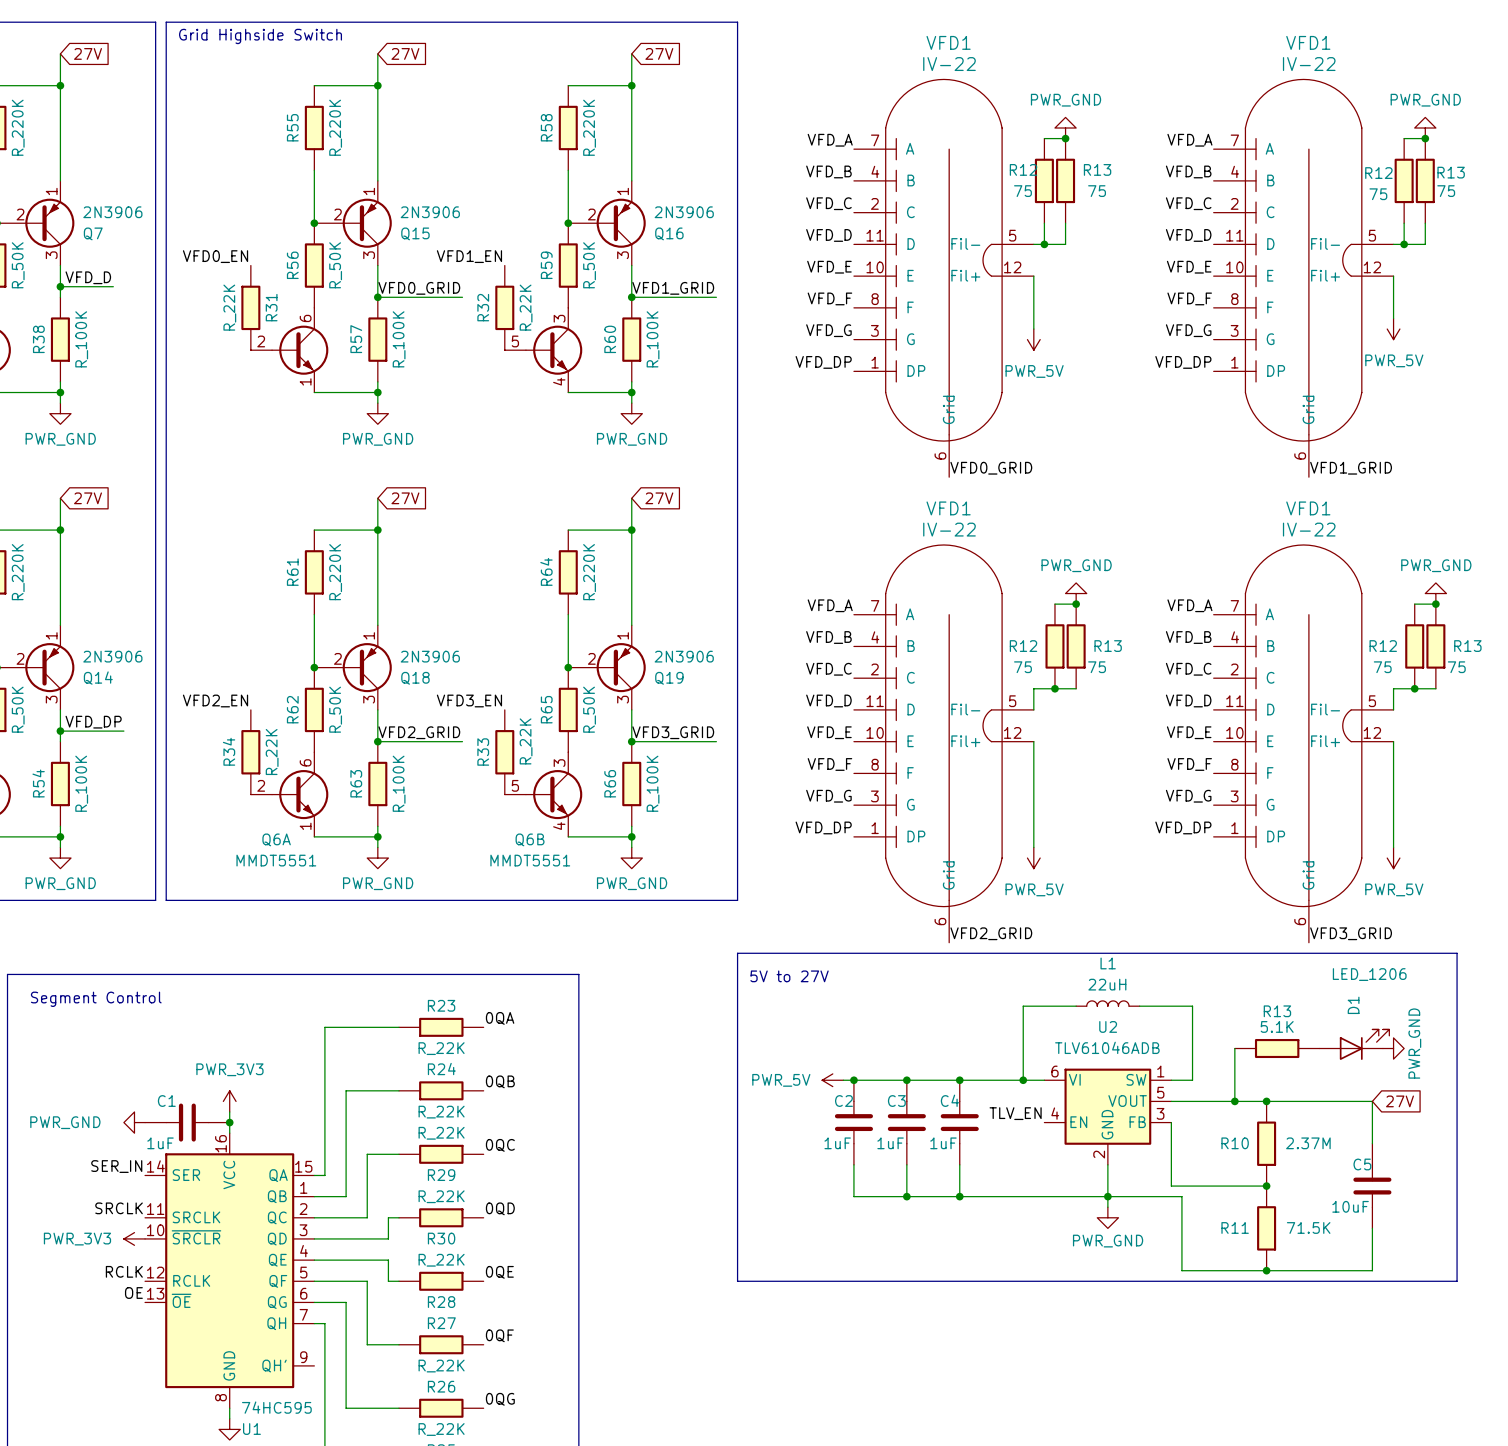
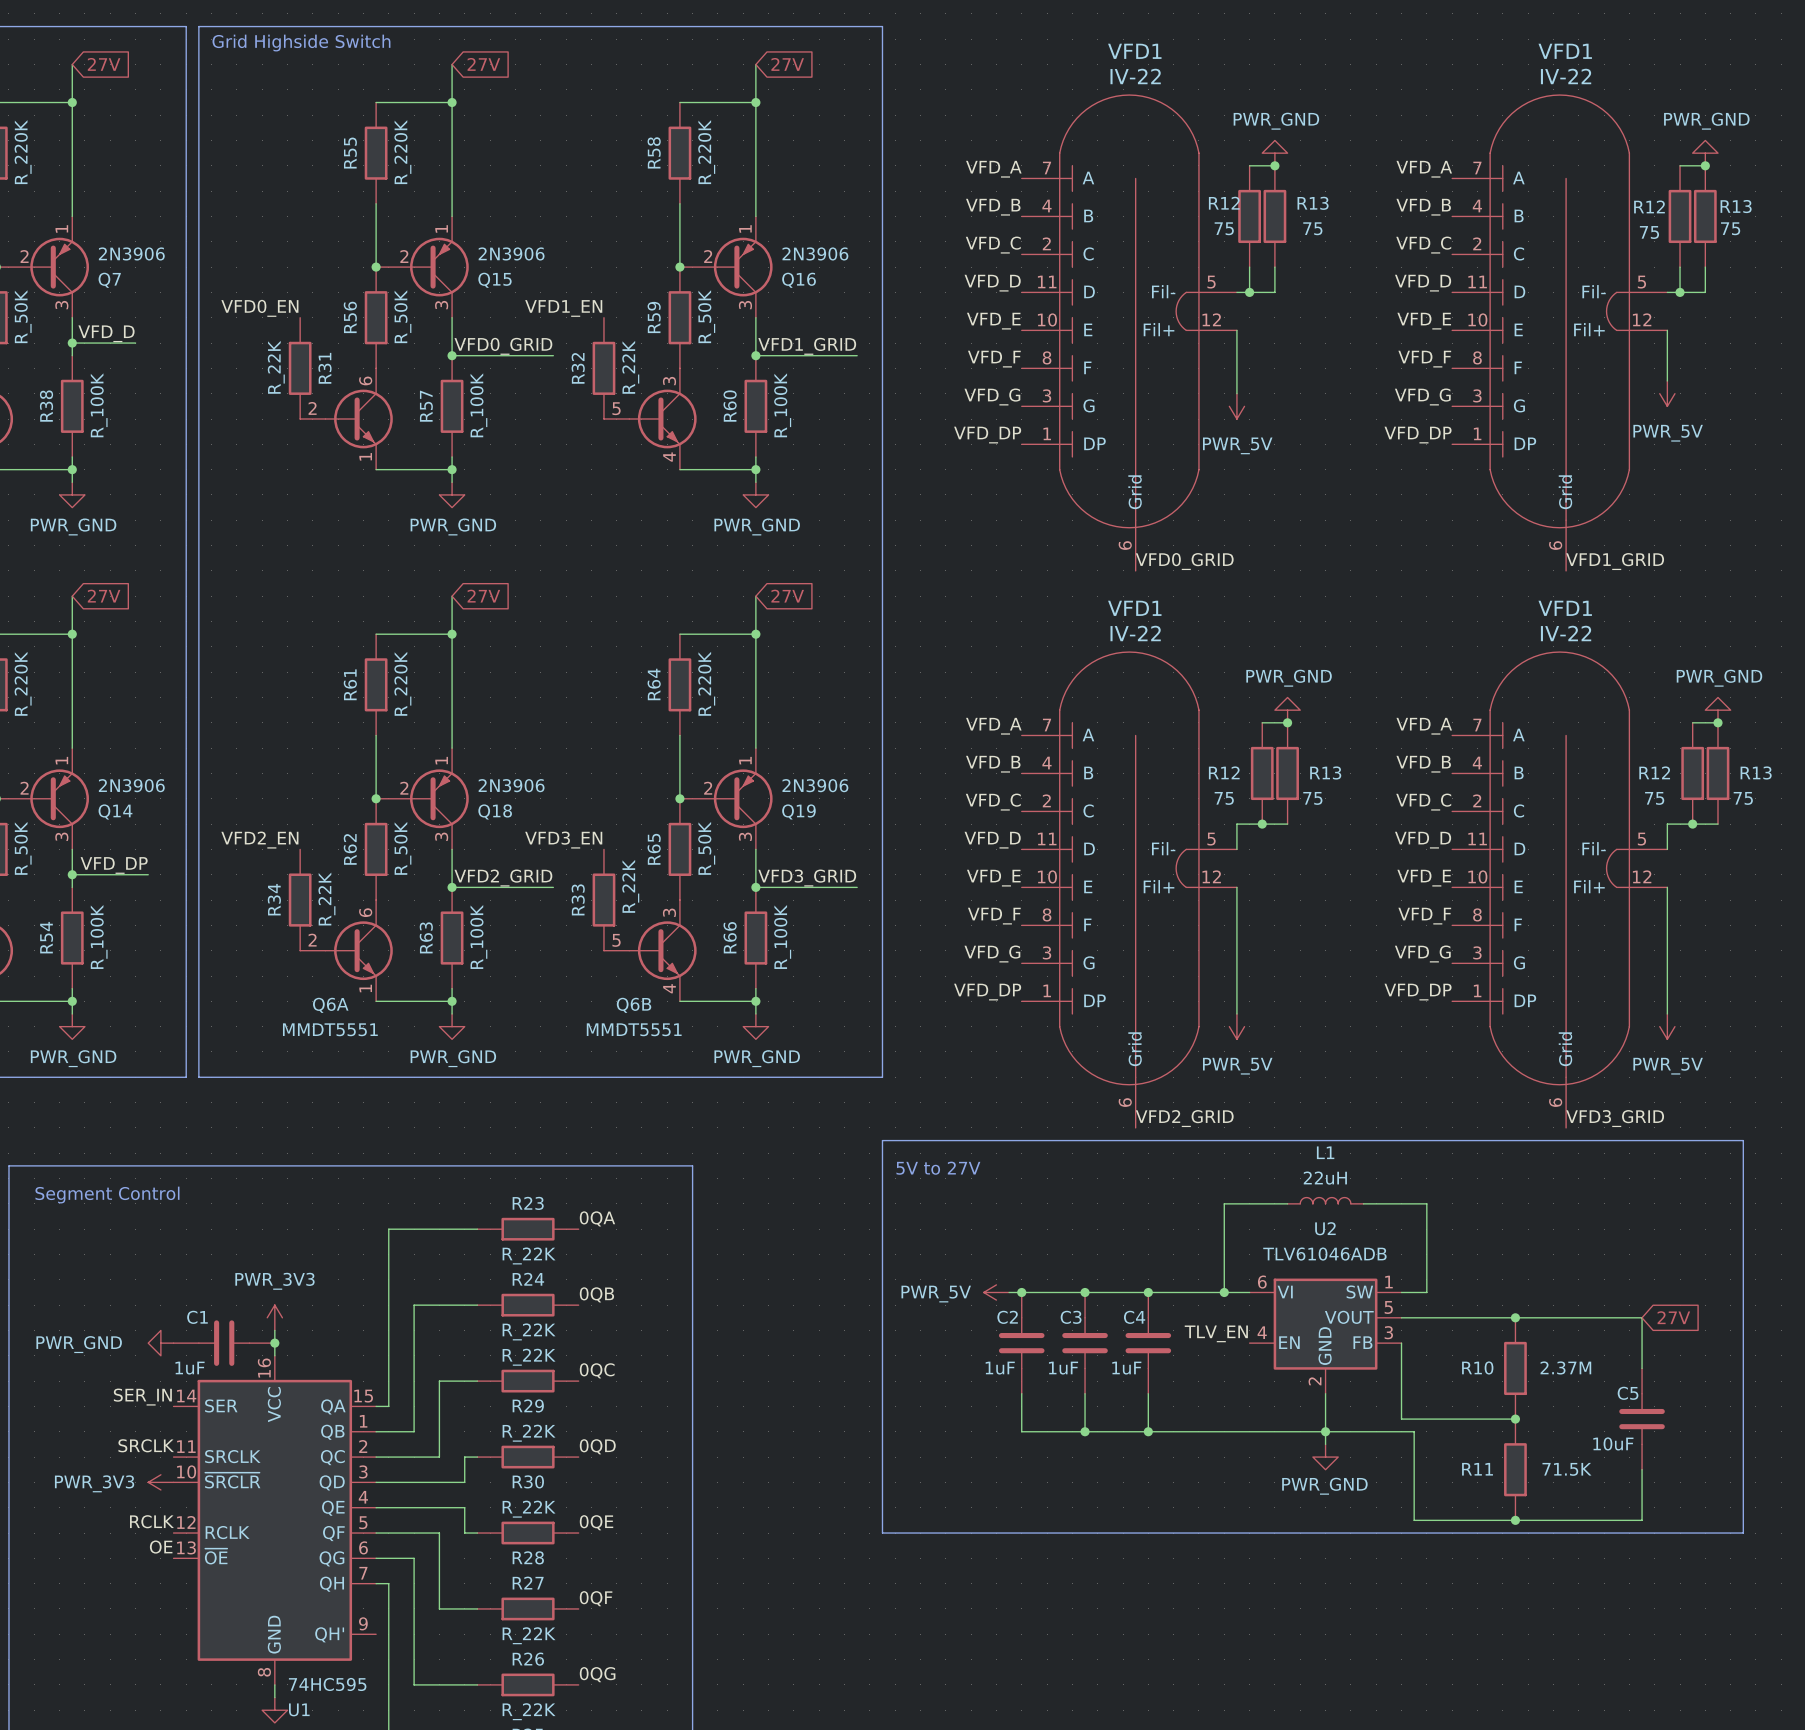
D1: LED_1206 (1354, 1044) -> none
wire: (1234, 1048) (1234, 1101) -> none
R13: 5.1K (1277, 1048) -> none
power symbol: PWR_GND (1393, 1048) -> none
junction: (1234, 1101) -> none

